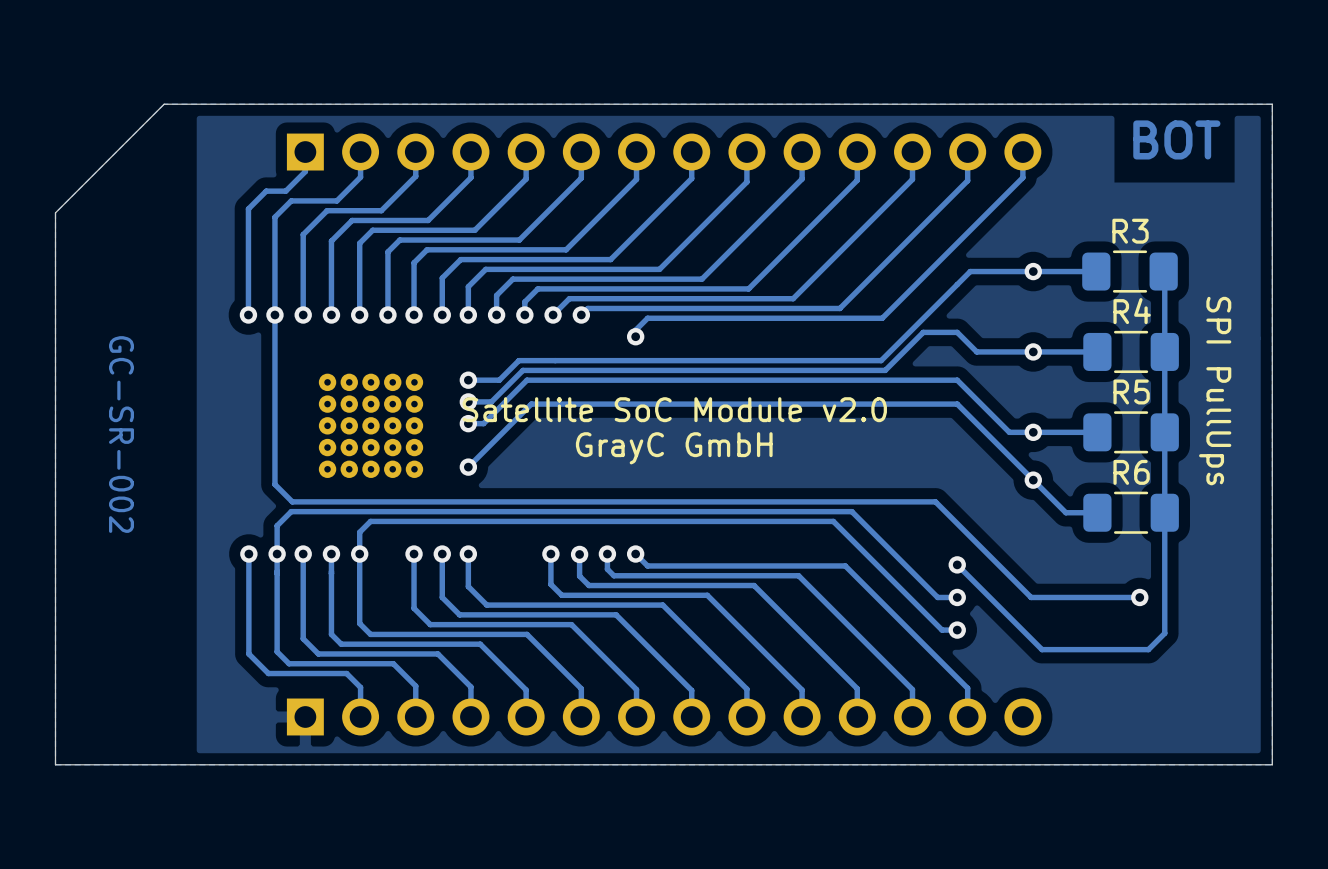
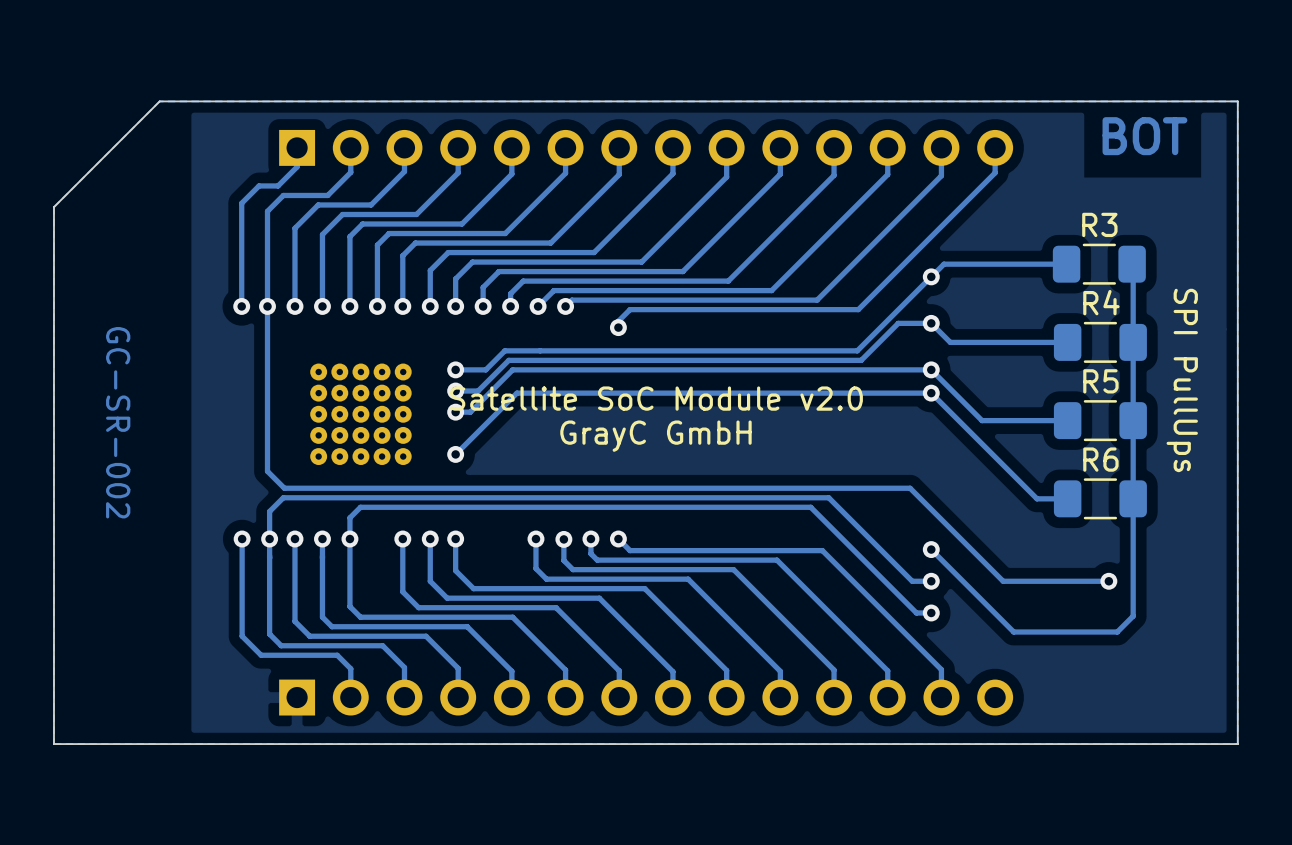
via: (1033, 271) -> none
via: none -> (931, 276)
via: none -> (931, 323)
via: (1033, 351) -> none
via: none -> (931, 369)
via: none -> (931, 393)
via: (1033, 432) -> none
via: (1033, 480) -> none

